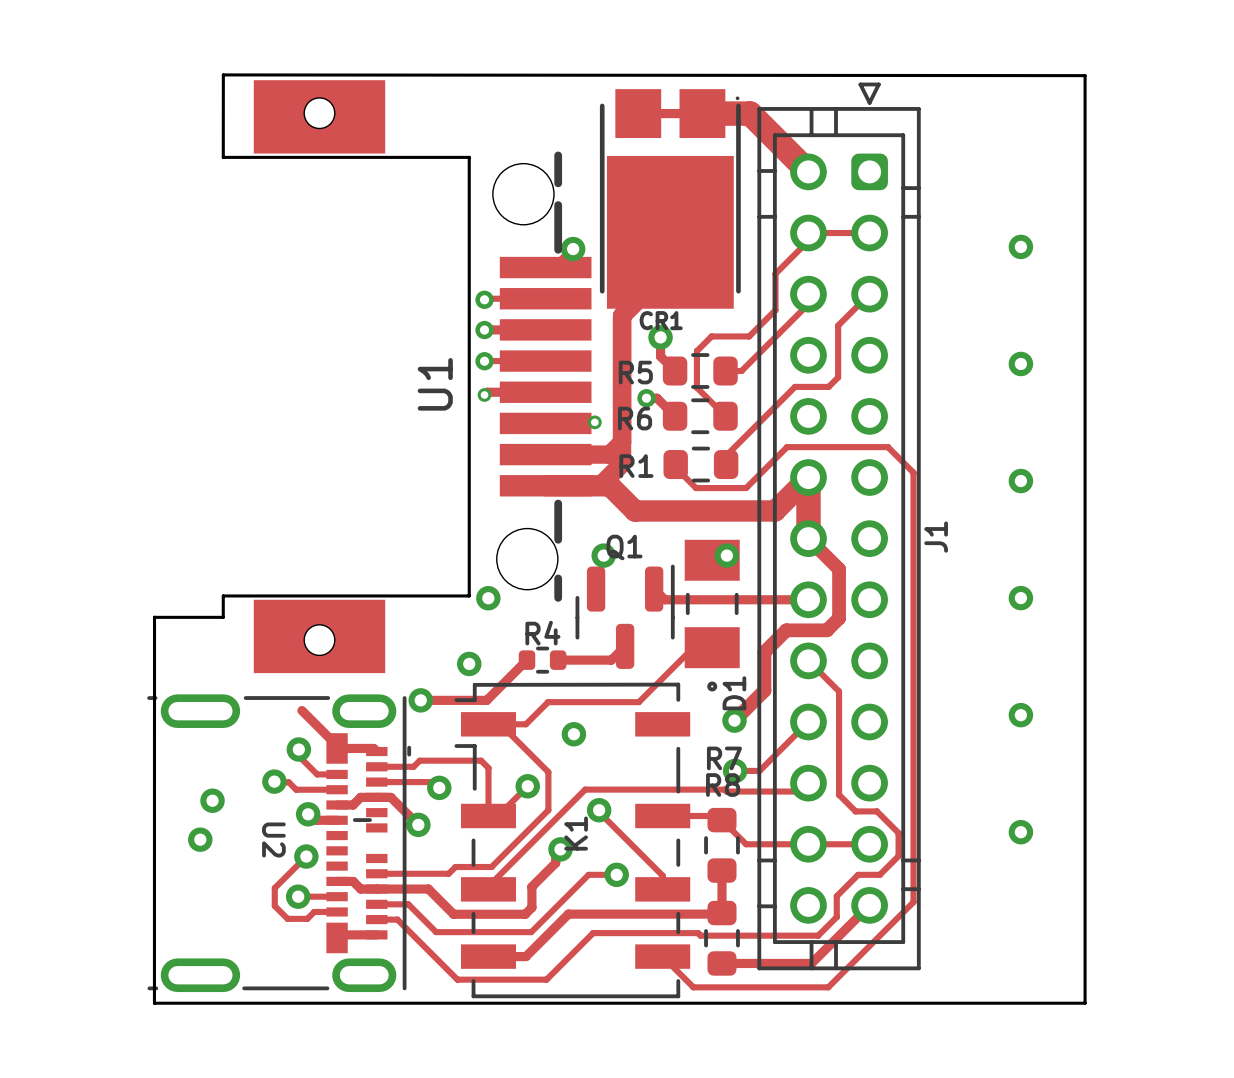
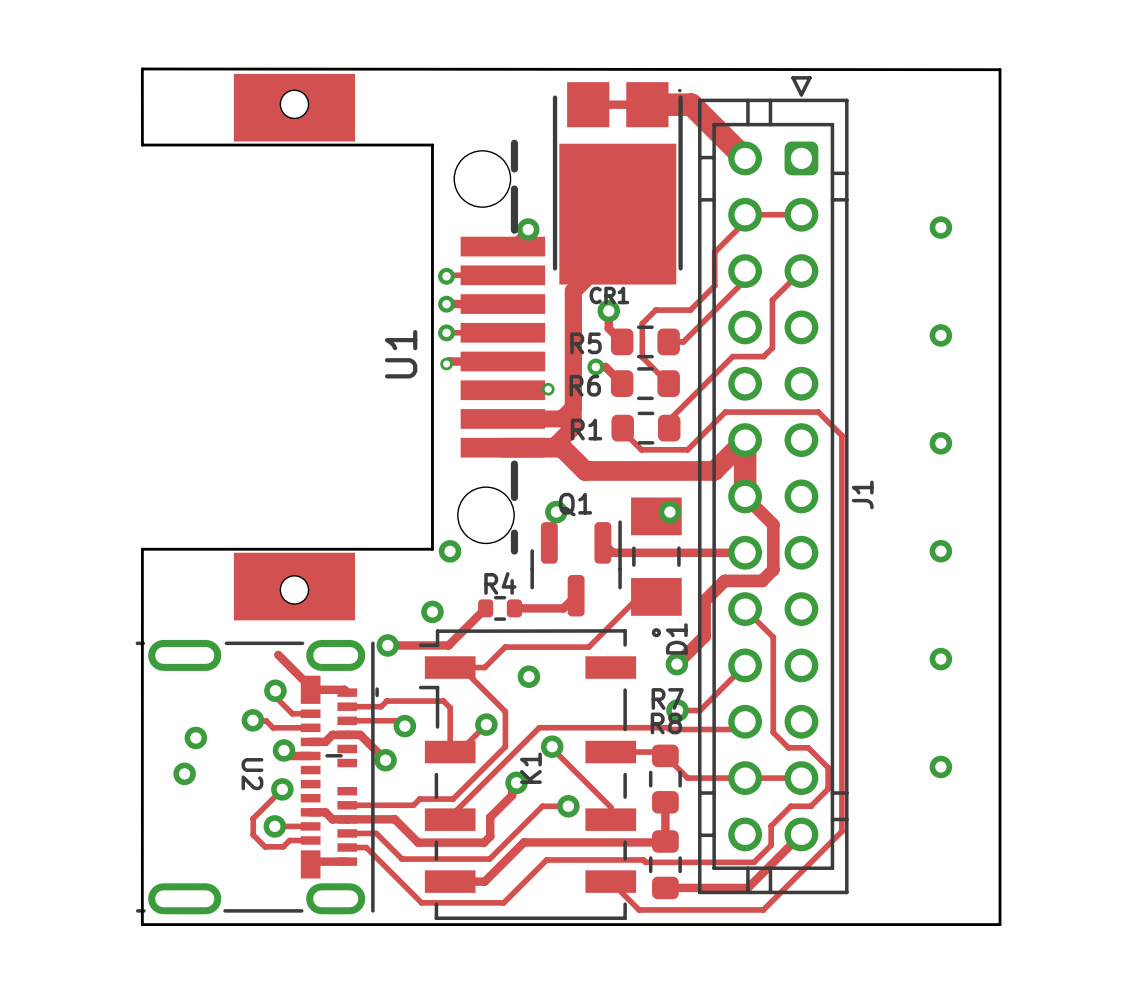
board edge: (223, 74) (223, 157) (469, 157) (469, 595) (223, 595) (223, 617) (154, 617) -> (205, 69) (142, 68) (142, 145)
U1 footprint: [253, 80, 592, 674] -> [140, 73, 546, 621]
board edge: none -> (142, 549) (142, 568)

